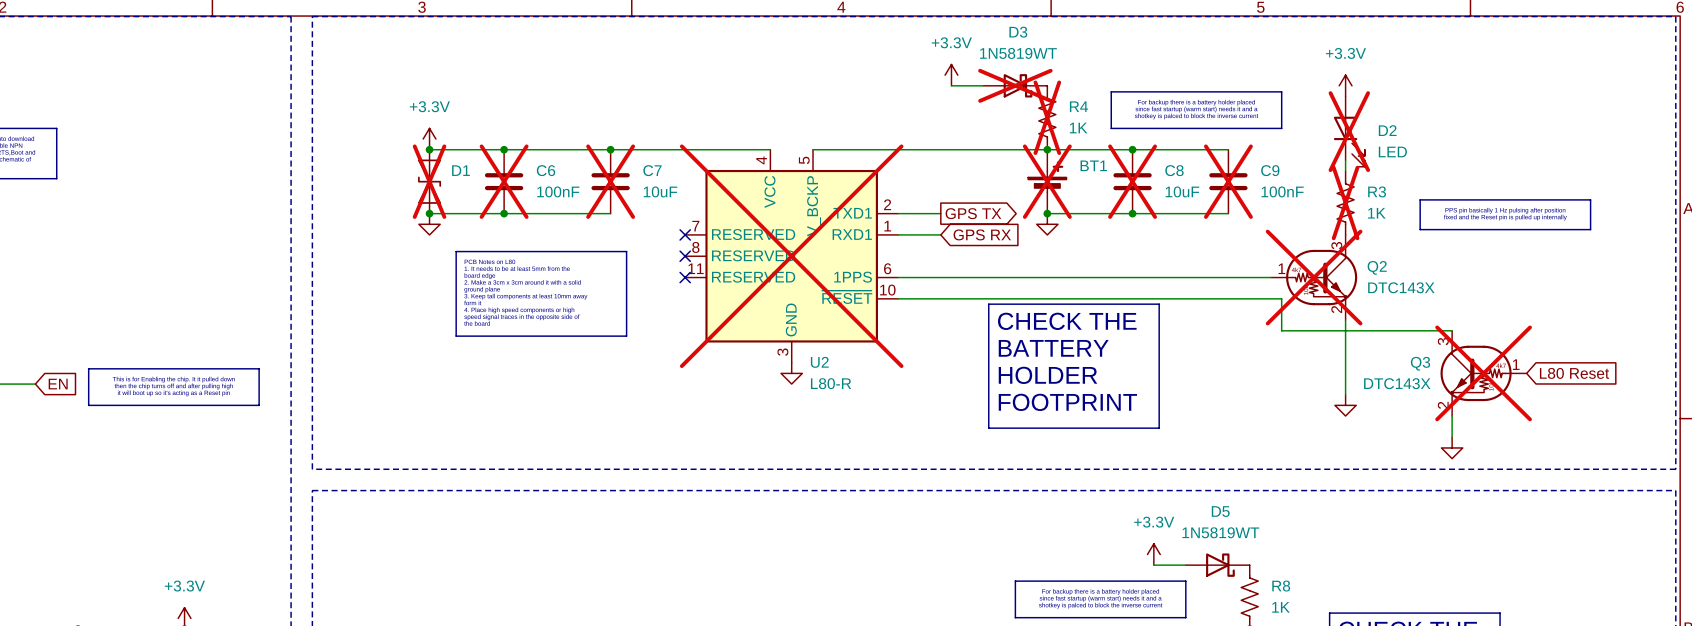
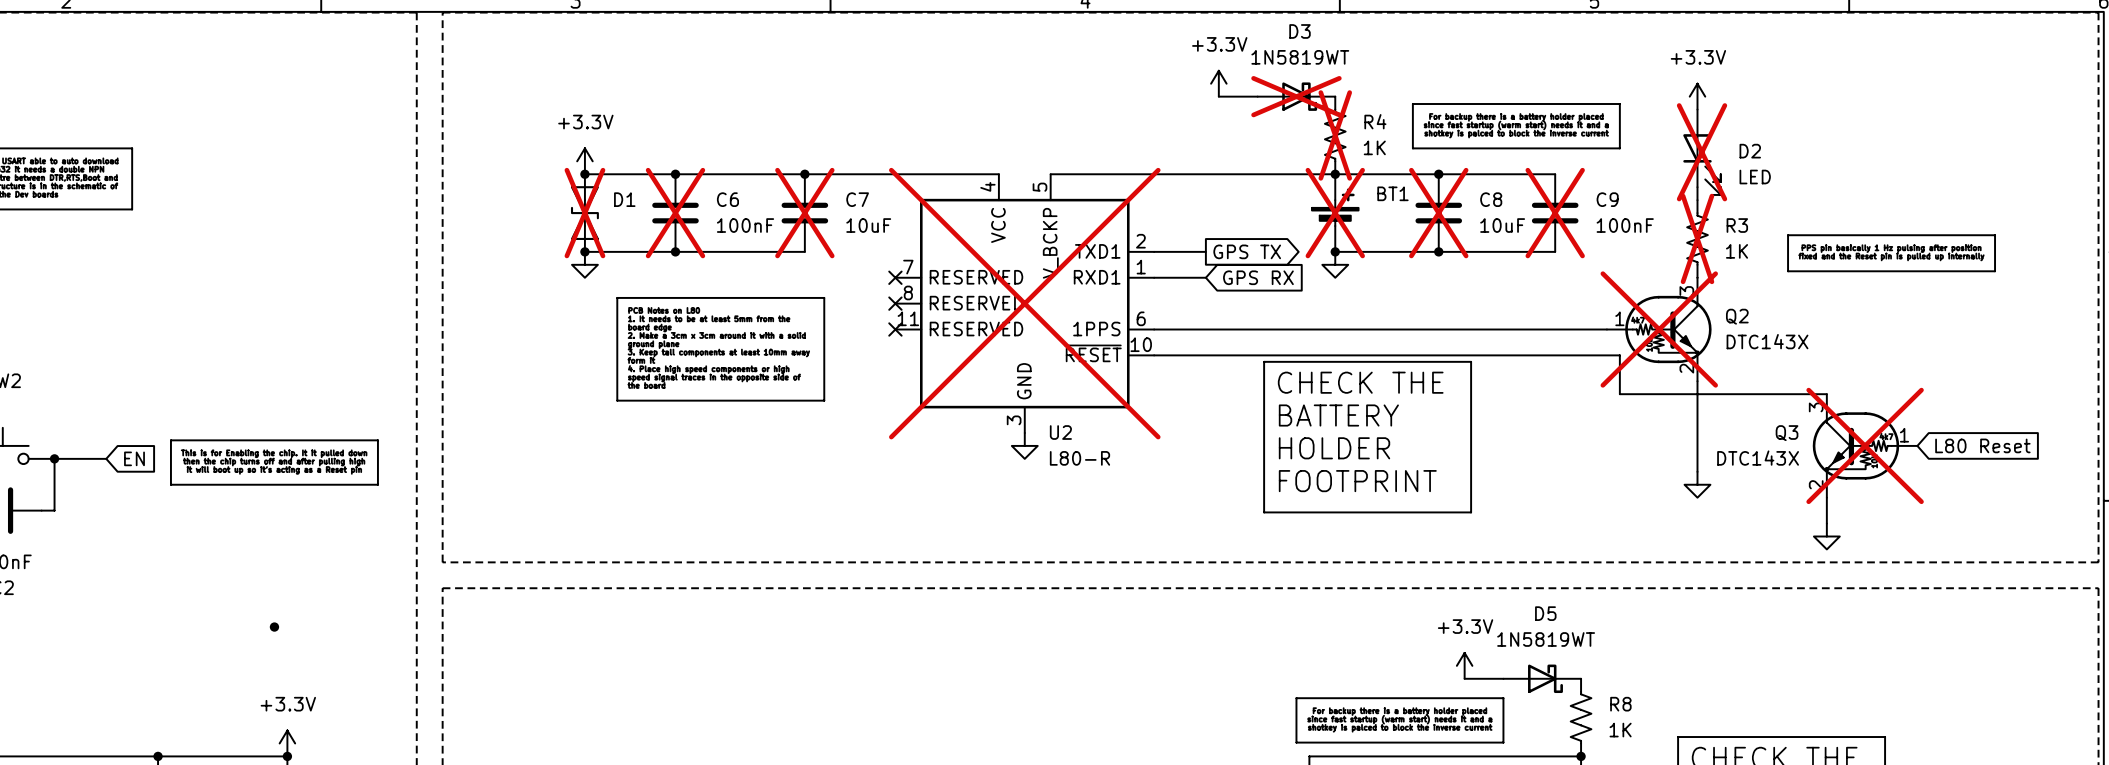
junction: none -> (274, 627)

